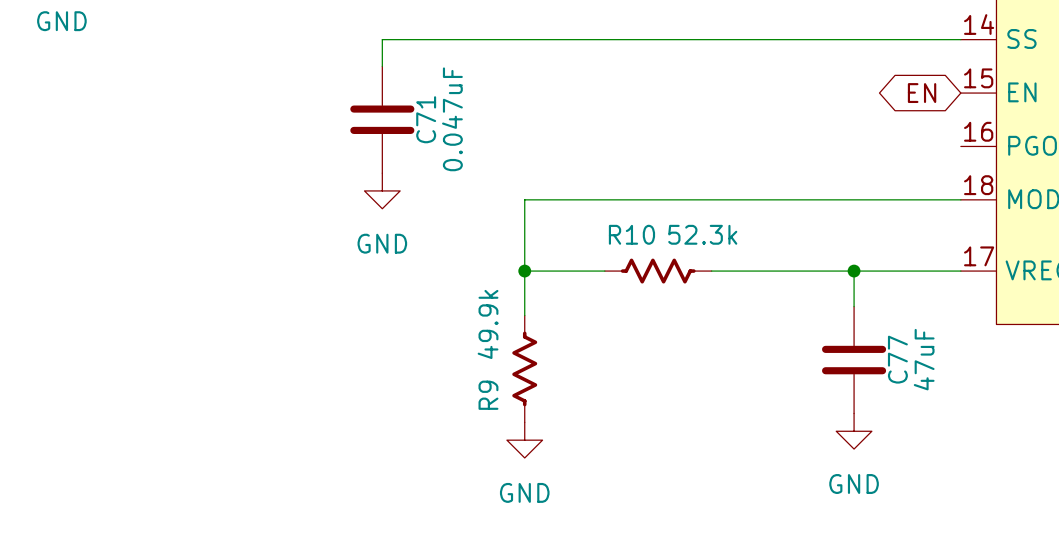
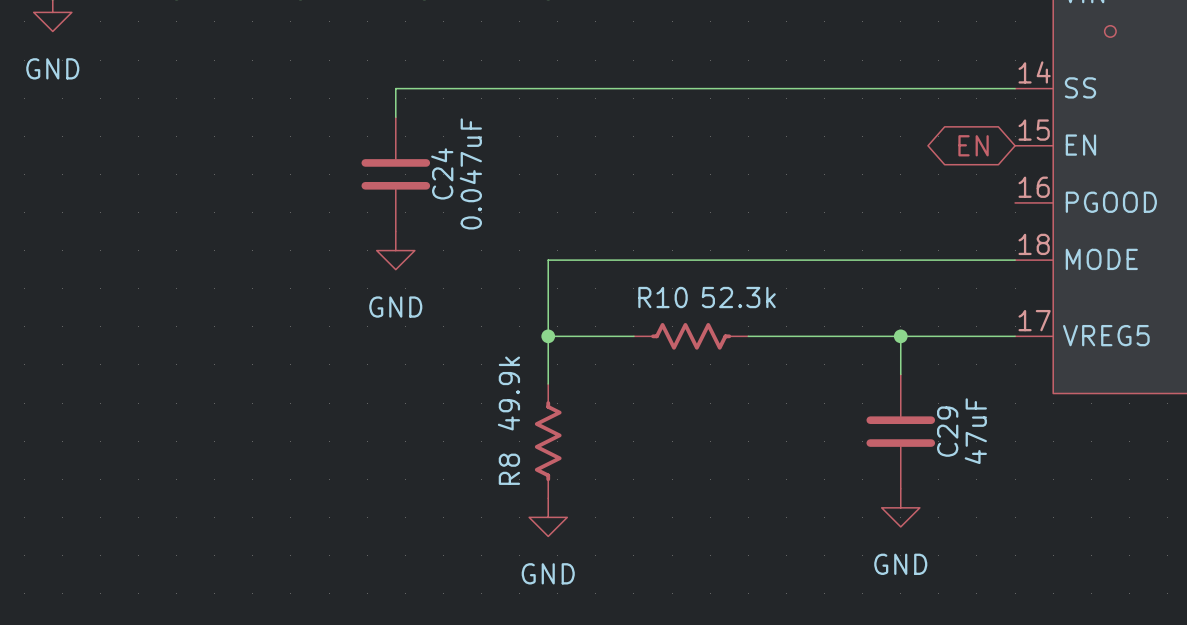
C71 name: C71 (426, 119) -> C24 (442, 173)
C77 name: C77 (897, 359) -> C29 (947, 431)
R9 name: R9 (488, 395) -> R8 (509, 469)

